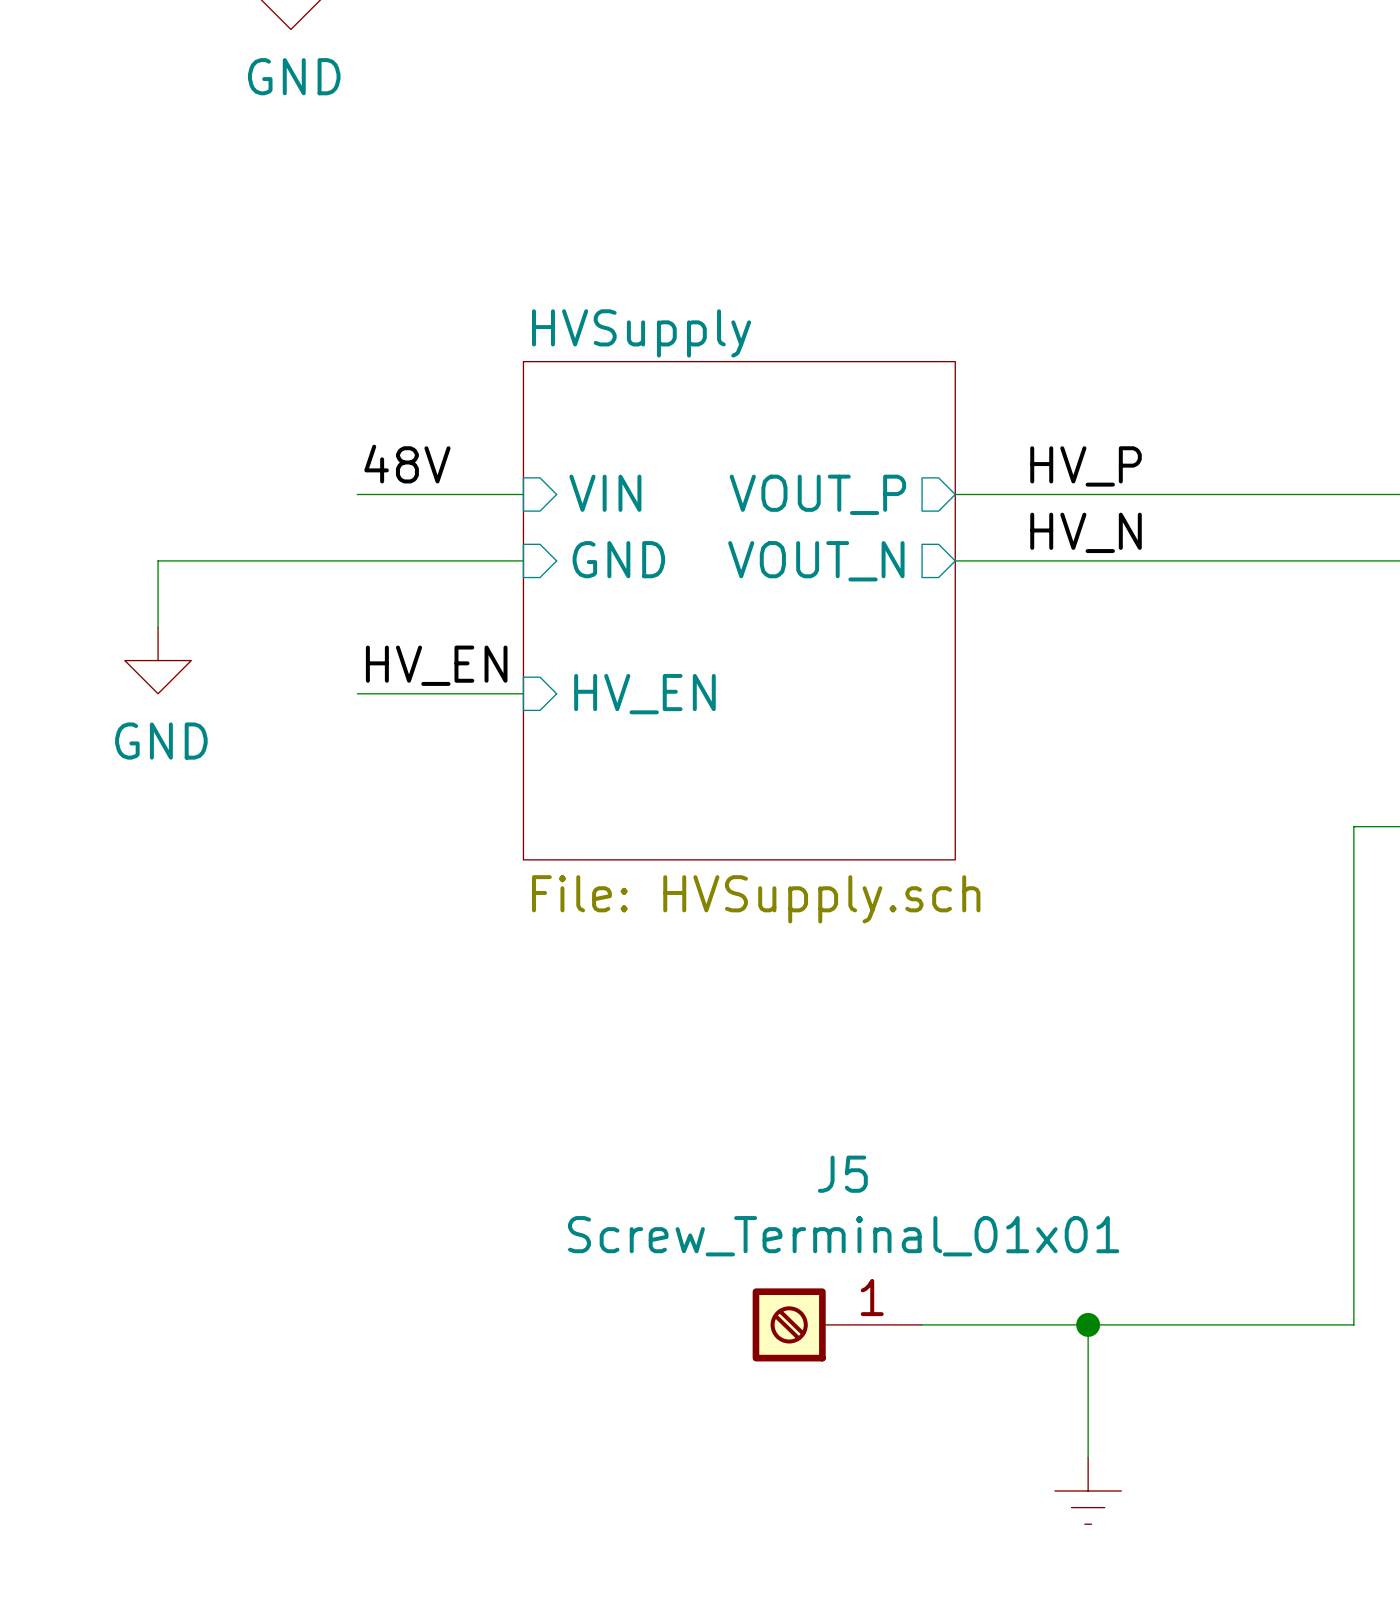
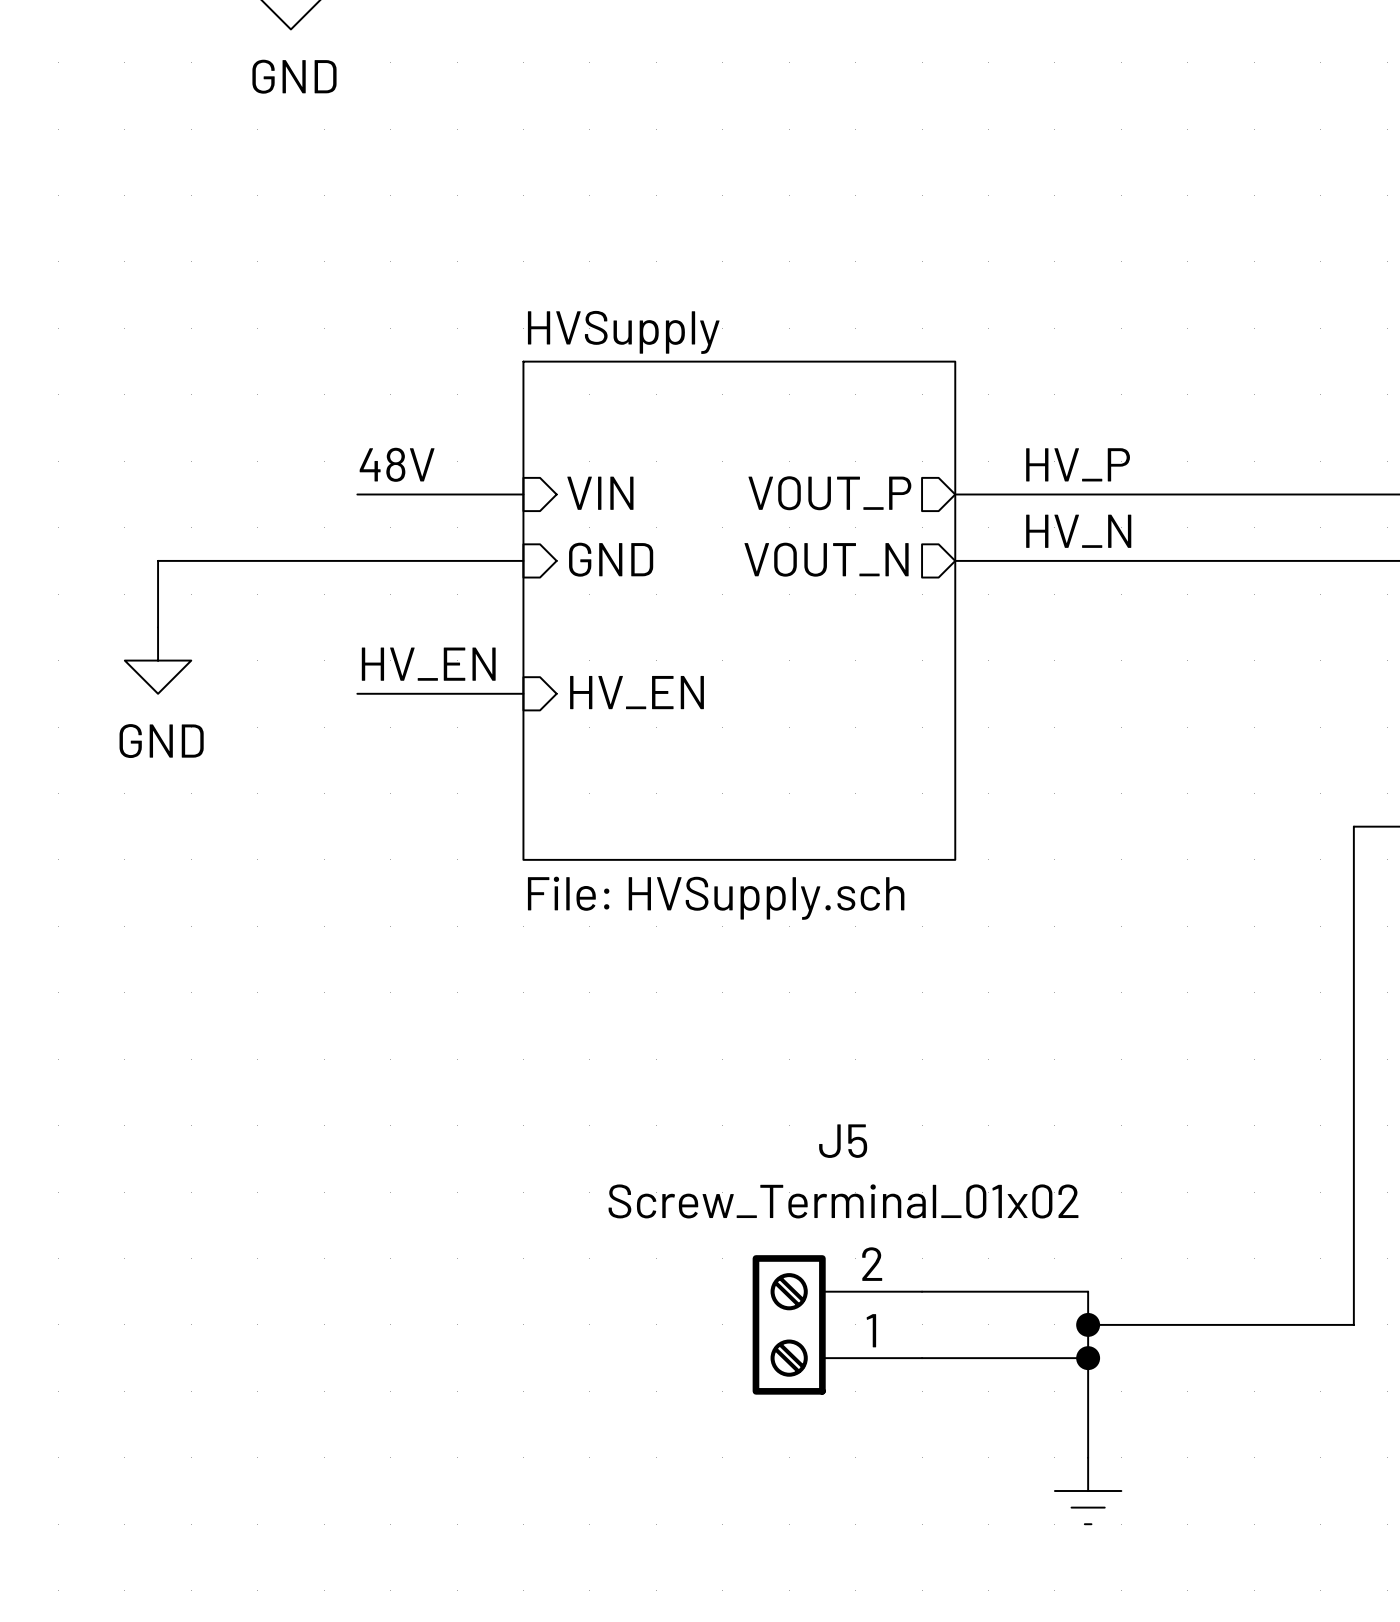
J5 value: Screw_Terminal_01x01 (843, 1236) -> Screw_Terminal_01x02 (843, 1201)
J5 symbol: [752, 1288, 923, 1362] -> [752, 1255, 923, 1395]
wire: (922, 1324) (1088, 1324) -> (922, 1291) (1088, 1291) (1088, 1324)
wire: none -> (922, 1358) (1088, 1358)
junction: none -> (1088, 1358)

